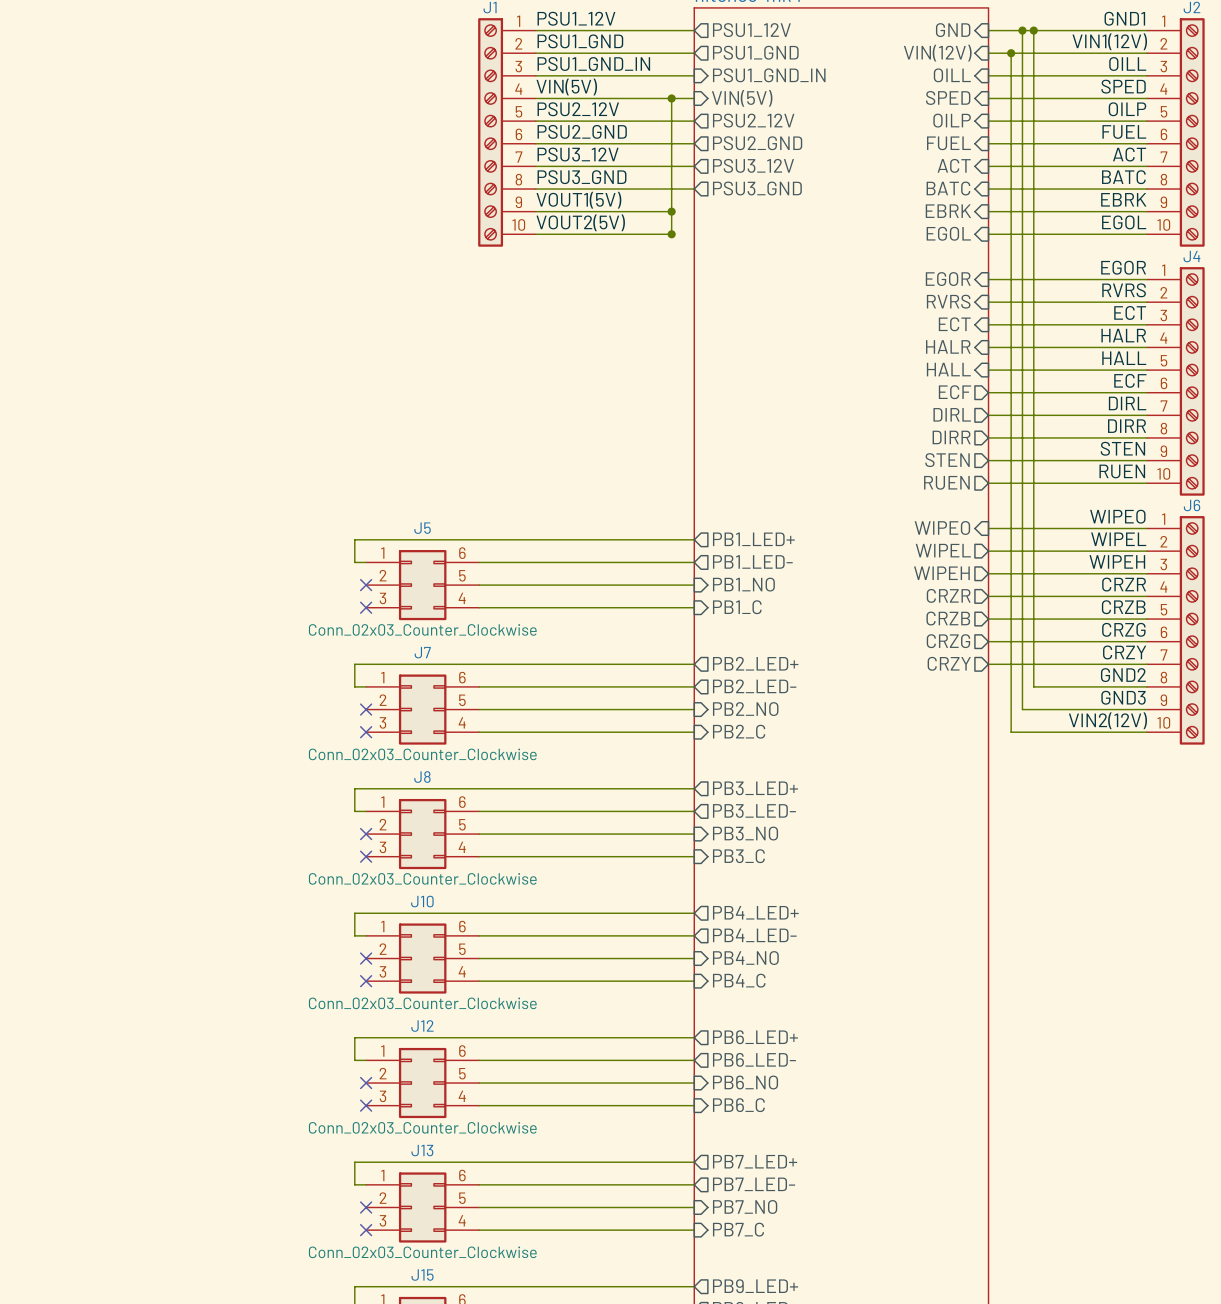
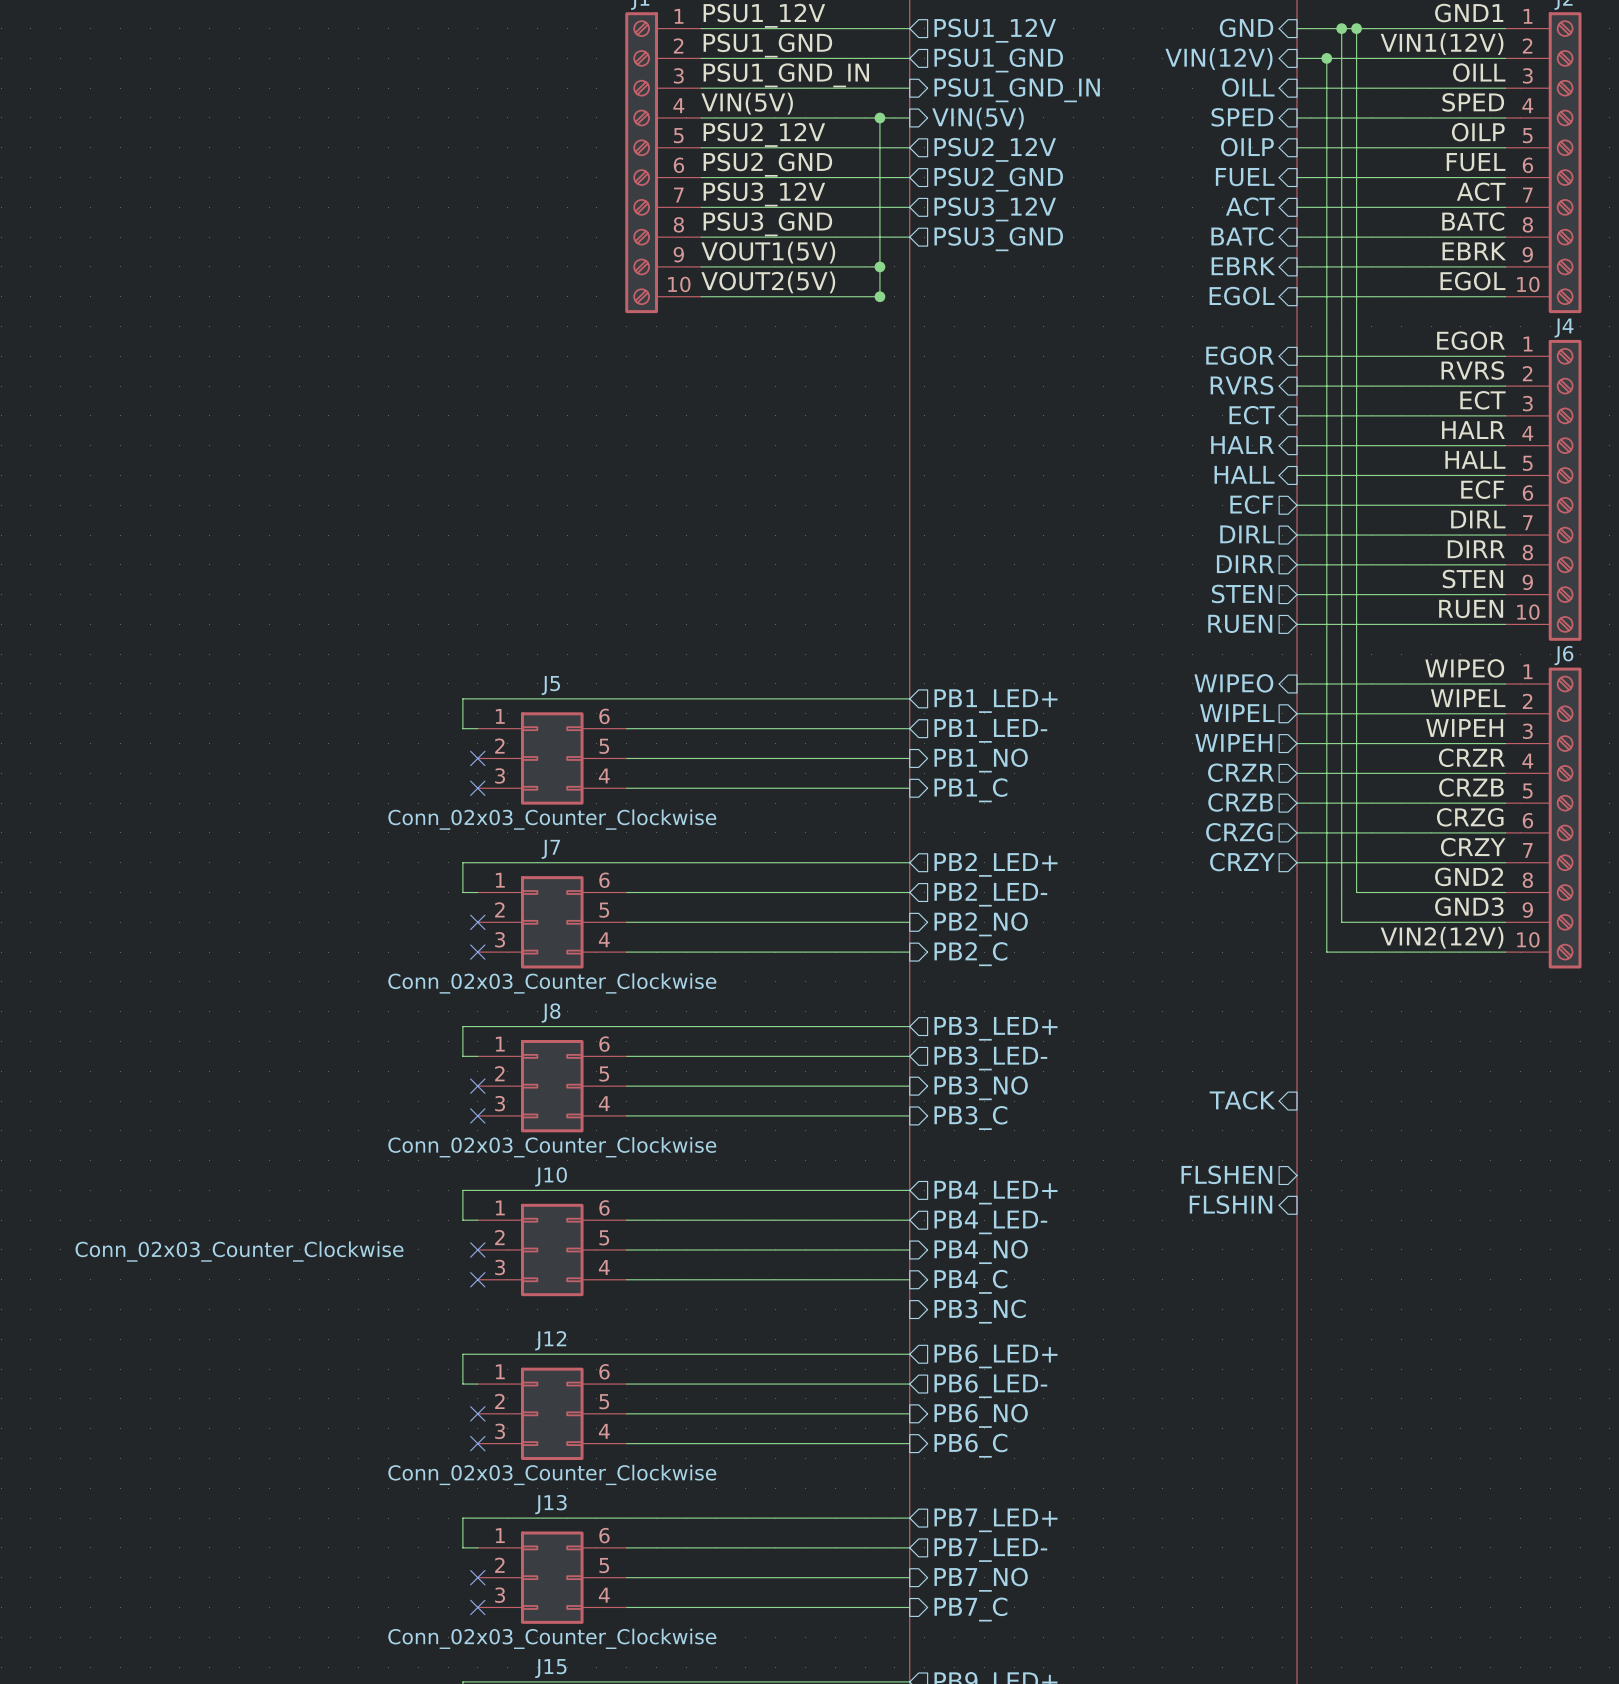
sheet pin: none -> TACK (1242, 1100)
sheet pin: none -> FLSHEN (1226, 1174)
sheet pin: none -> FLSHIN (1231, 1204)
J10 value position: Conn_02x03_Counter_Clockwise (422, 1003) -> Conn_02x03_Counter_Clockwise (239, 1251)
sheet pin: none -> PB3_NC (980, 1311)

